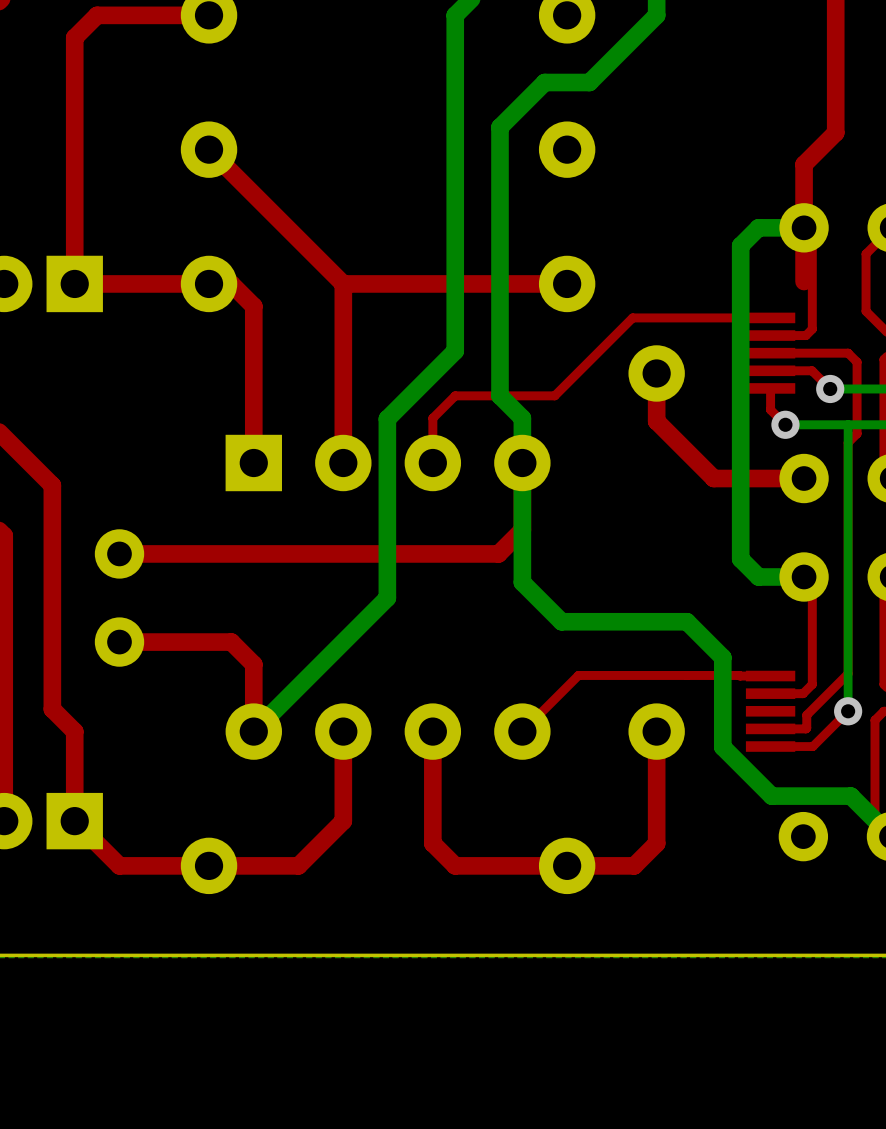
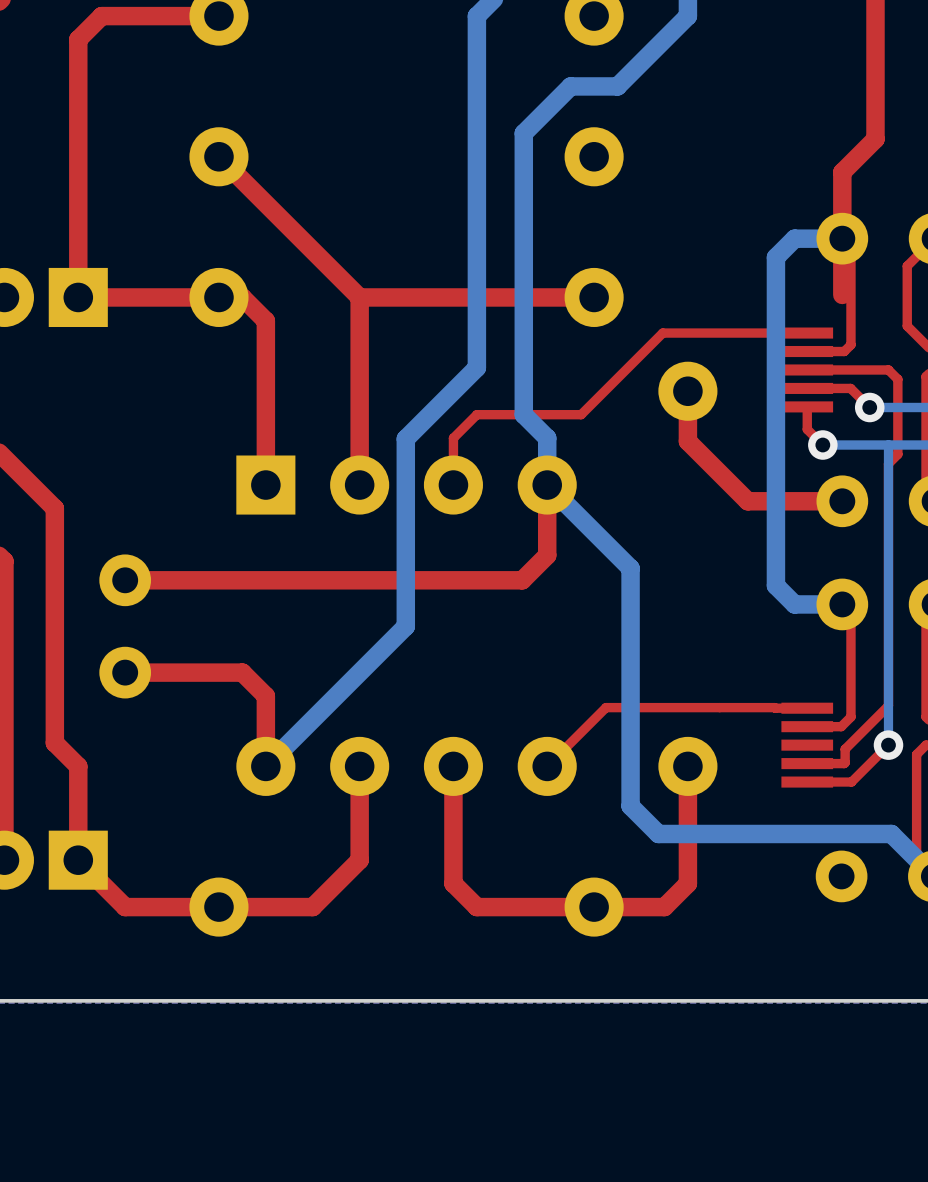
bottom track: (522, 463) (522, 582) (561, 621) (686, 621) (722, 657) (722, 747) (771, 796) -> (547, 485) (630, 568) (630, 806) (658, 833) (808, 833)

